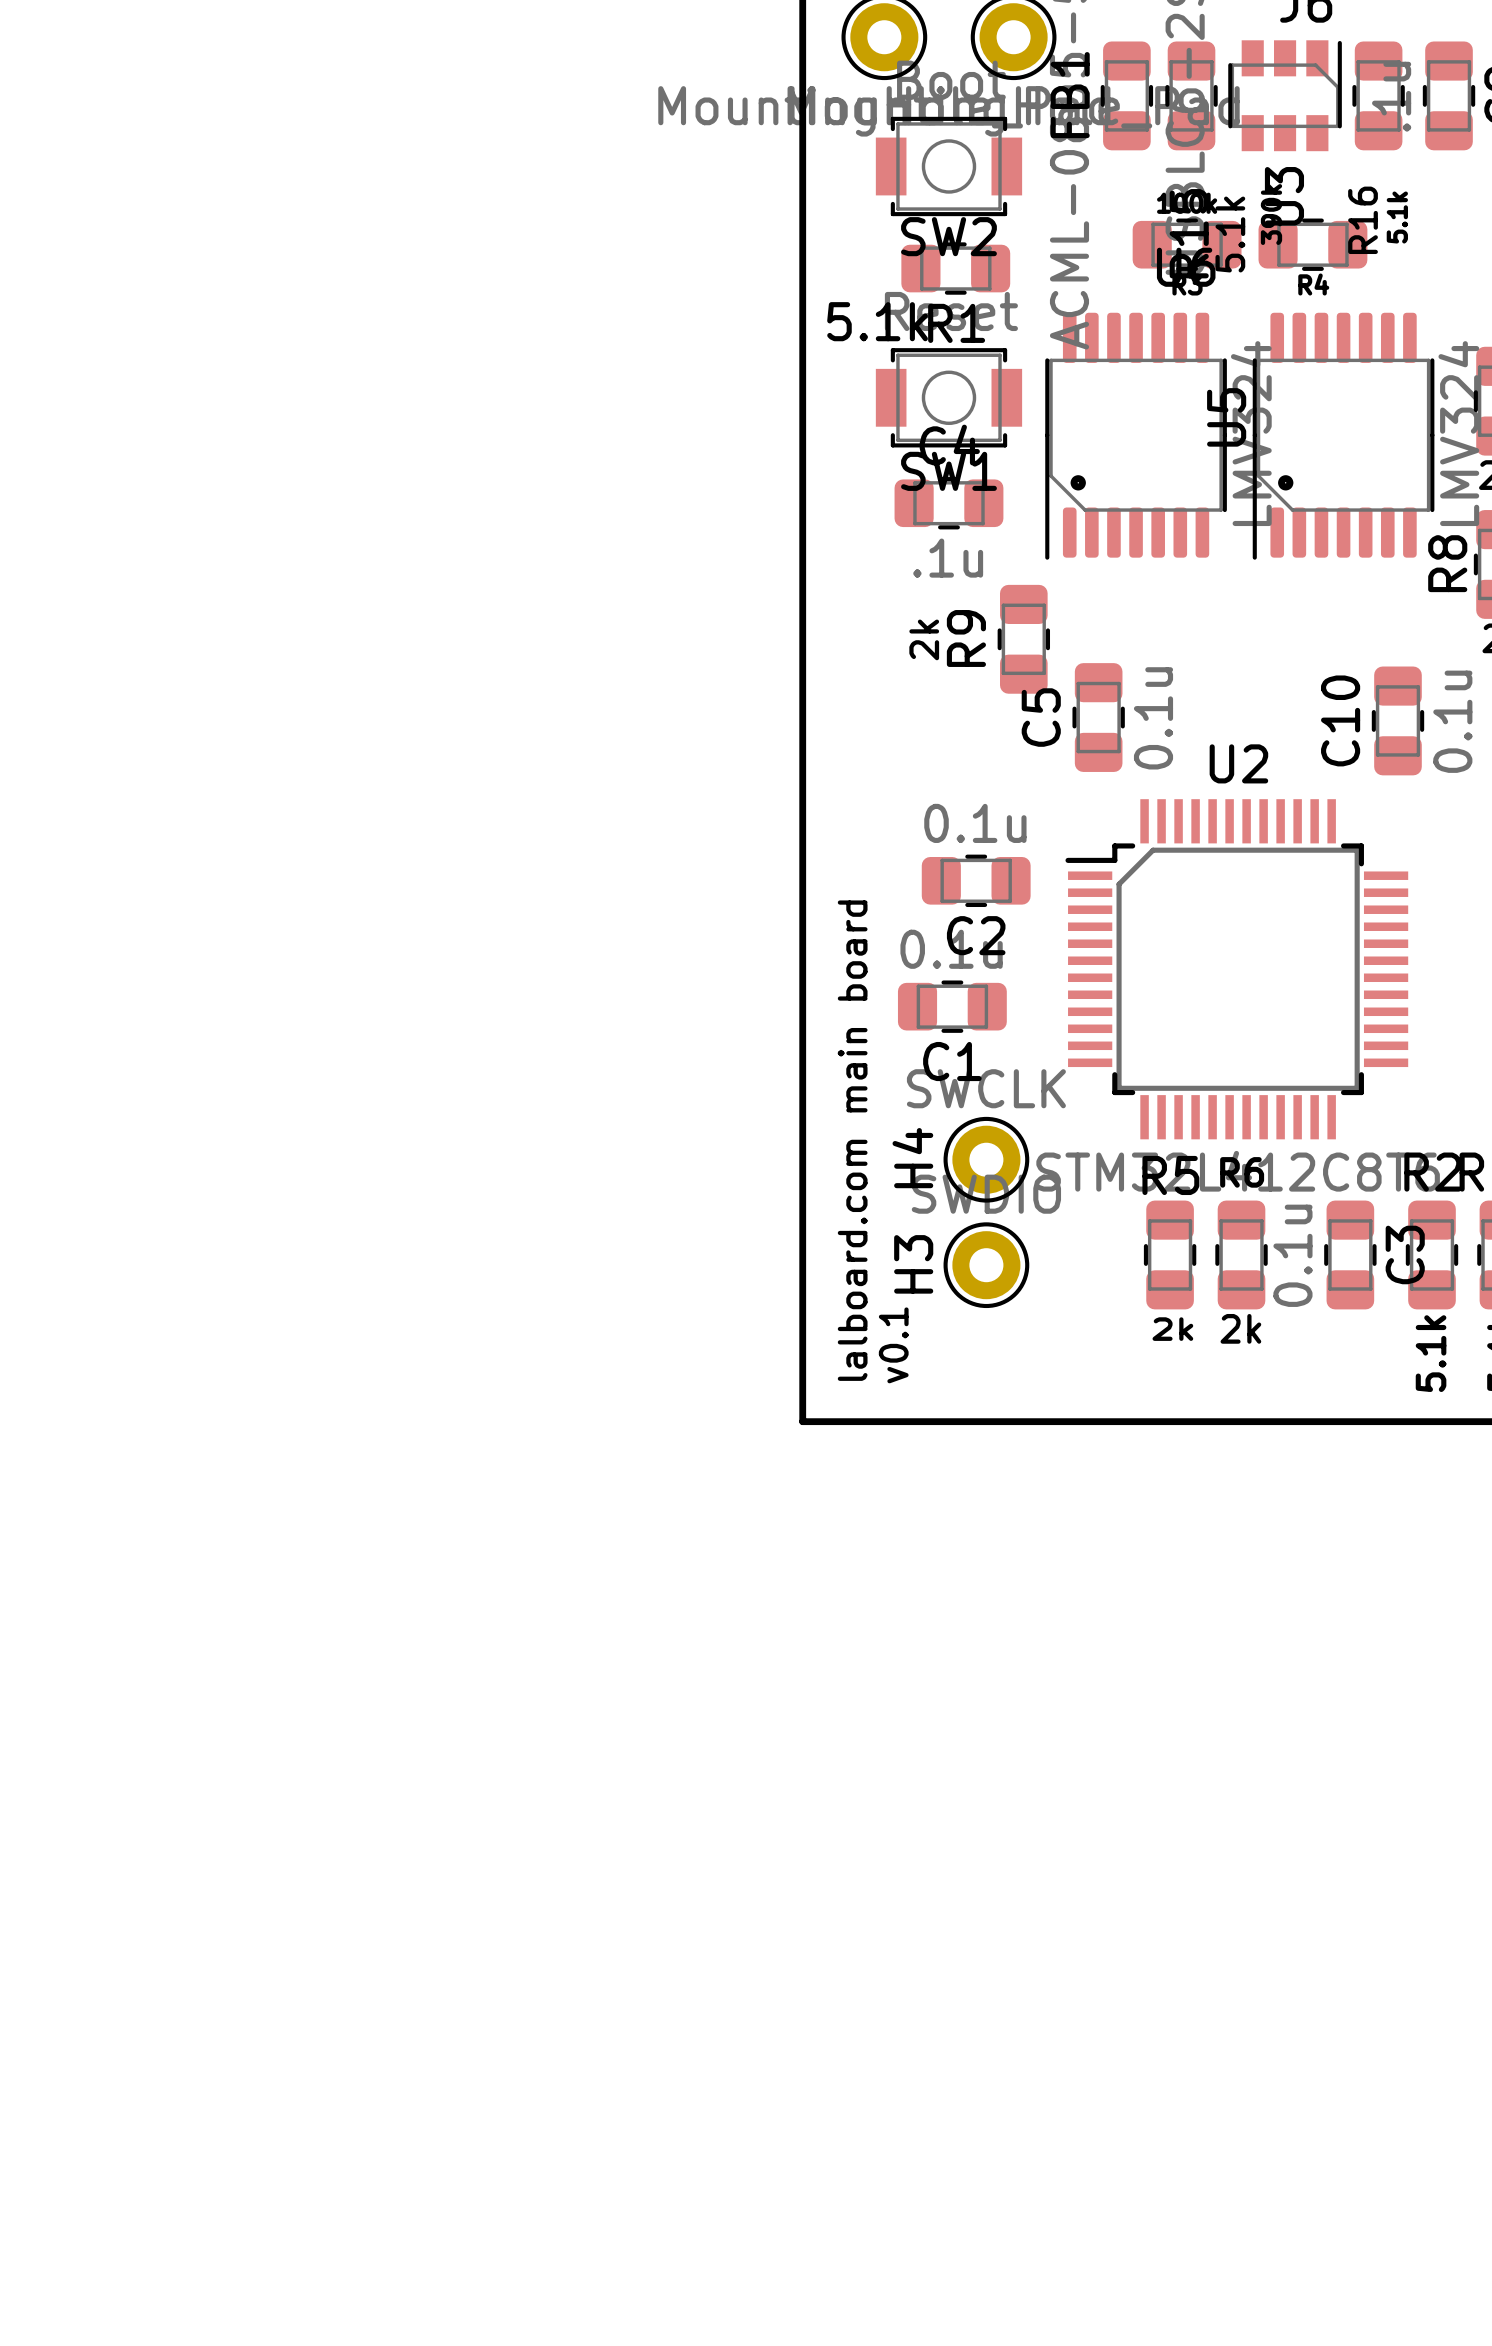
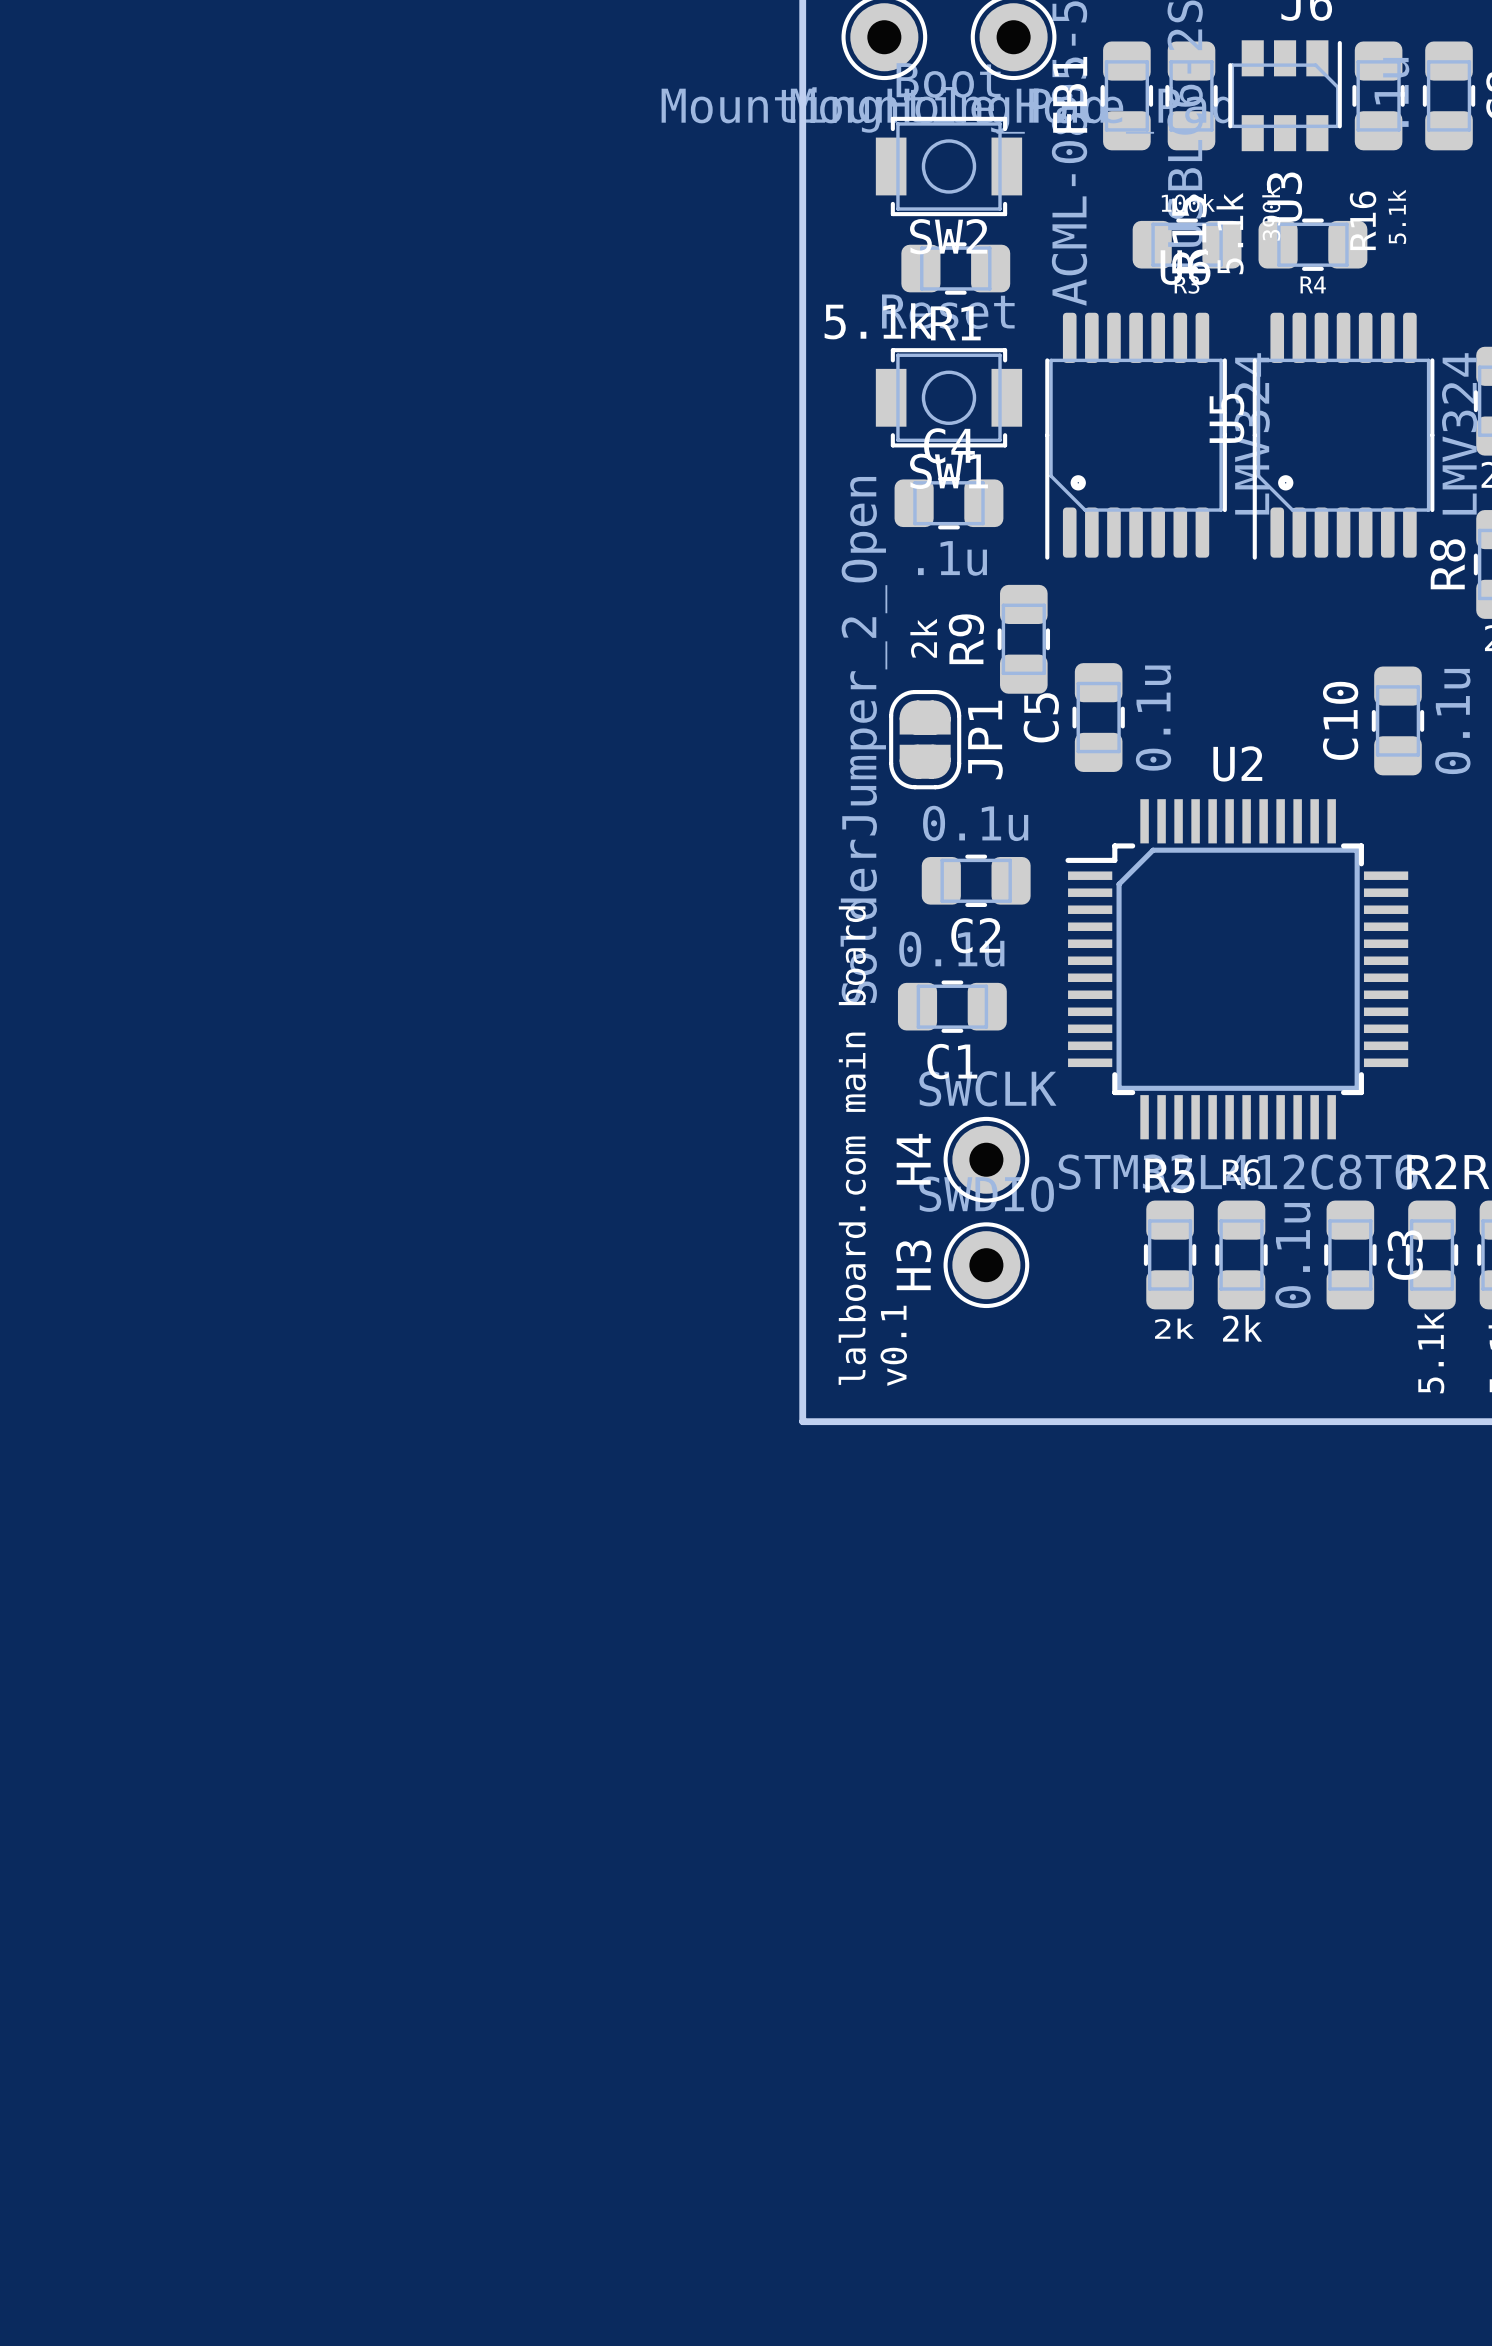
JP1: none -> SolderJumper_2_Open (925, 739)

